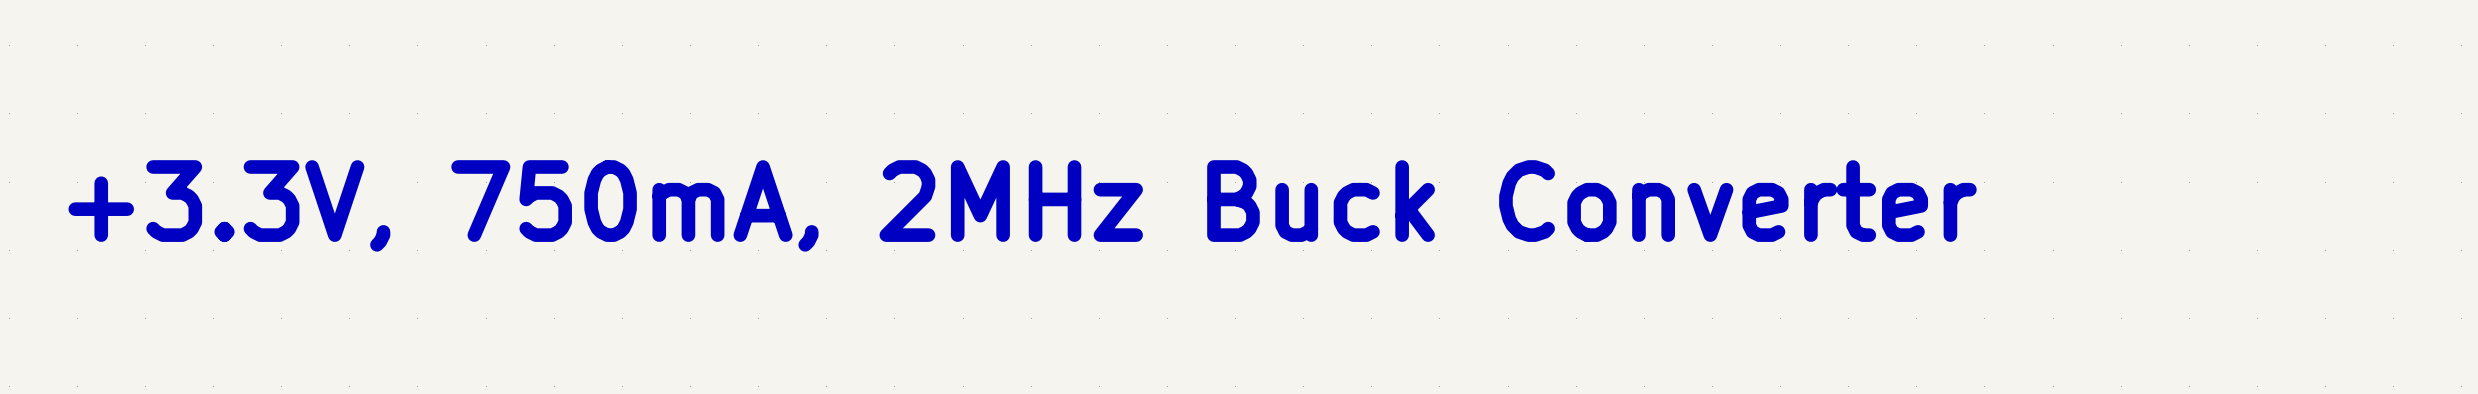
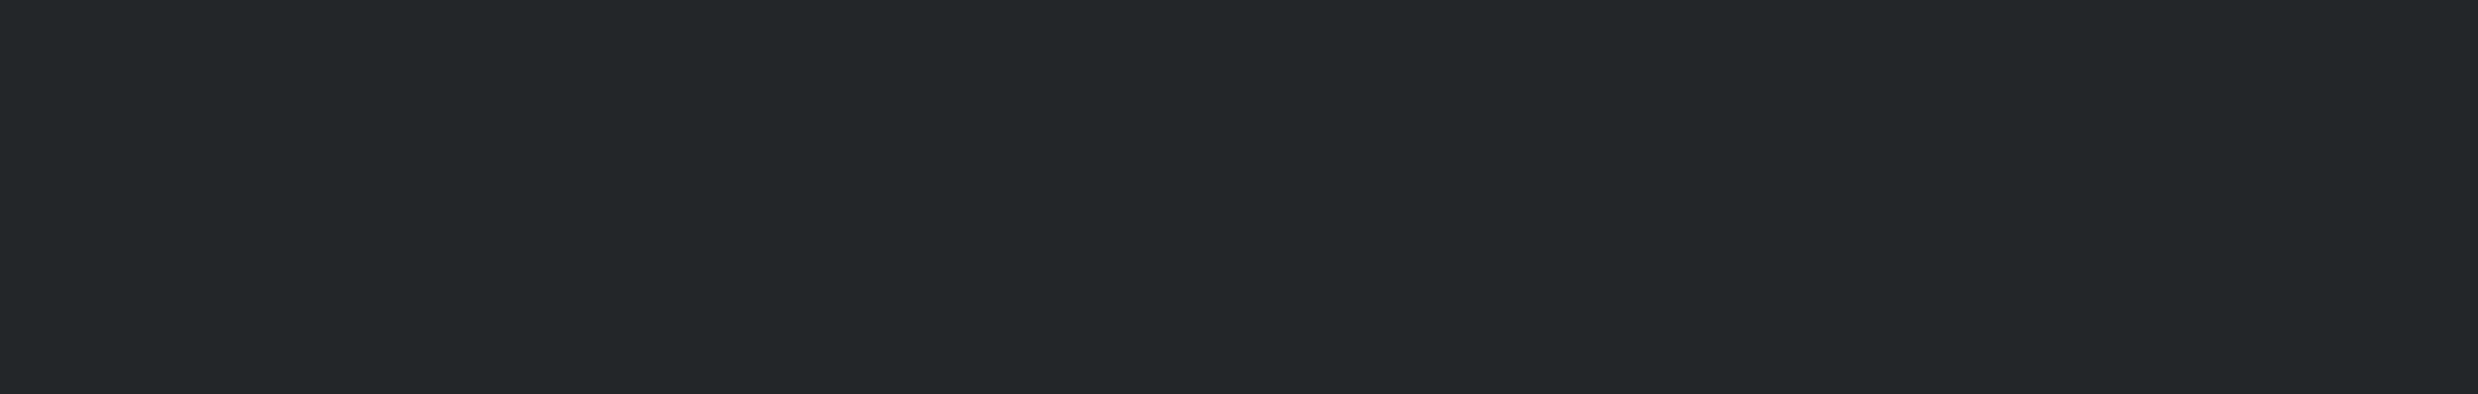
text: +3.3V, 750mA, 2MHz Buck Converter (1022, 205) -> none

